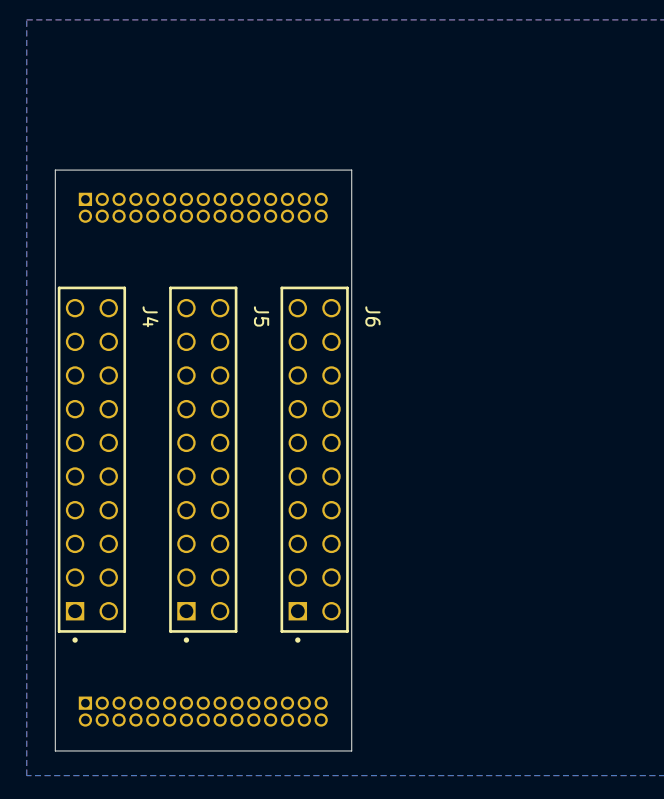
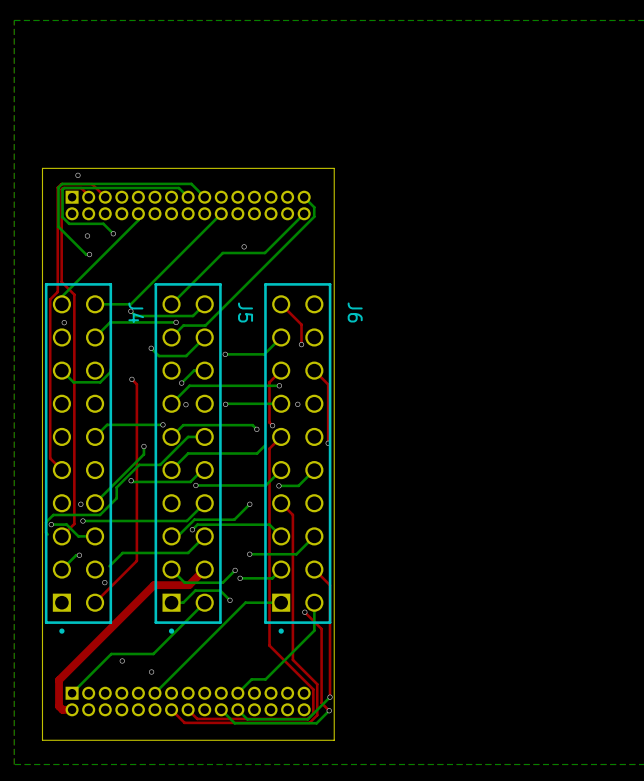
via: none -> (77, 175)
top track: none -> (88, 197) (81, 188) (61, 189) (61, 282) (74, 294) (74, 523) (61, 536)
top track: none -> (105, 197) (92, 184) (61, 184) (57, 187) (57, 291) (50, 299) (50, 458) (61, 470)
bottom track: none -> (188, 197) (178, 188) (64, 188) (62, 189) (62, 217) (69, 223) (103, 223) (113, 233)
bottom track: none -> (204, 197) (191, 183) (62, 183) (58, 187) (58, 226) (86, 254) (89, 254)
bottom track: none -> (304, 197) (314, 207) (314, 216) (205, 325) (183, 325) (171, 337)
bottom track: none -> (138, 213) (138, 220) (61, 296) (61, 304)
bottom track: none -> (221, 213) (130, 304) (95, 304)
bottom track: none -> (304, 213) (264, 253) (222, 253) (171, 304)
via: none -> (113, 233)
via: none -> (87, 235)
via: none -> (244, 246)
via: none -> (89, 254)
bottom track: none -> (204, 304) (193, 316) (135, 316) (130, 311)
top track: none -> (281, 304) (301, 324) (301, 344)
via: none -> (130, 311)
via: none -> (64, 322)
bottom track: none -> (176, 322) (110, 322) (95, 337)
via: none -> (176, 322)
bottom track: none -> (204, 337) (186, 356) (158, 356) (151, 348)
bottom track: none -> (281, 337) (264, 354) (225, 354)
via: none -> (301, 344)
via: none -> (151, 348)
via: none -> (225, 354)
bottom track: none -> (110, 369) (110, 371) (100, 382) (73, 382) (61, 370)
bottom track: none -> (204, 370) (194, 370) (181, 383)
top track: none -> (281, 370) (269, 382) (269, 422) (272, 425)
top track: none -> (314, 370) (328, 384) (328, 443)
top track: none -> (131, 379) (136, 384) (136, 560) (95, 602)
via: none -> (131, 379)
via: none -> (181, 383)
bottom track: none -> (279, 385) (189, 385) (171, 403)
via: none -> (279, 385)
via: none -> (225, 404)
bottom track: none -> (281, 403) (225, 404)
via: none -> (297, 404)
via: none -> (185, 404)
bottom track: none -> (162, 424) (107, 424) (95, 436)
via: none -> (162, 424)
via: none -> (272, 425)
bottom track: none -> (256, 429) (252, 425) (183, 425) (171, 436)
via: none -> (256, 429)
bottom track: none -> (204, 436) (188, 436) (160, 464) (139, 464) (116, 487) (116, 498) (100, 514) (53, 514) (46, 522) (47, 534)
top track: none -> (281, 436) (269, 448) (269, 645) (313, 689) (313, 713) (307, 718) (197, 718) (188, 709)
via: none -> (328, 443)
bottom track: none -> (265, 445) (257, 453) (188, 453) (171, 470)
bottom track: none -> (143, 446) (143, 454) (95, 503)
via: none -> (143, 446)
bottom track: none -> (204, 470) (202, 470) (190, 481) (131, 480)
bottom track: none -> (281, 470) (265, 485) (195, 485)
bottom track: none -> (314, 470) (298, 485) (278, 485)
via: none -> (131, 480)
via: none -> (195, 485)
via: none -> (278, 485)
bottom track: none -> (204, 503) (186, 521) (82, 521)
top track: none -> (281, 503) (292, 514) (292, 659) (317, 684) (317, 715) (309, 722) (184, 722) (171, 709)
via: none -> (80, 504)
bottom track: none -> (249, 504) (234, 519) (194, 519) (177, 536) (171, 536)
via: none -> (249, 504)
via: none -> (82, 521)
bottom track: none -> (51, 524) (66, 524) (78, 536) (95, 536)
via: none -> (51, 524)
bottom track: none -> (192, 529) (197, 524) (269, 524) (281, 536)
via: none -> (192, 529)
bottom track: none -> (204, 536) (188, 552) (122, 552) (109, 566)
bottom track: none -> (314, 536) (296, 554) (249, 554)
via: none -> (249, 554)
bottom track: none -> (79, 555) (76, 555) (61, 569)
via: none -> (79, 555)
bottom track: none -> (171, 569) (184, 582) (222, 582) (235, 570)
top track: none -> (204, 569) (189, 585) (154, 585) (59, 680) (59, 706) (62, 709) (72, 709)
bottom track: none -> (281, 569) (272, 578) (240, 578)
top track: none -> (314, 569) (330, 585) (330, 697)
via: none -> (235, 570)
via: none -> (240, 578)
via: none -> (104, 582)
bottom track: none -> (230, 600) (220, 590) (195, 590) (183, 602) (171, 602)
via: none -> (230, 600)
bottom track: none -> (204, 602) (153, 654) (111, 654) (72, 693)
bottom track: none -> (281, 602) (245, 602) (154, 693)
bottom track: none -> (314, 602) (314, 630) (265, 679) (251, 679) (237, 693)
top track: none -> (304, 612) (321, 629) (321, 703) (329, 710)
via: none -> (304, 612)
via: none -> (122, 660)
via: none -> (151, 672)
bottom track: none -> (330, 697) (307, 719) (247, 719) (237, 709)
via: none -> (330, 697)
bottom track: none -> (221, 709) (234, 723) (316, 723) (329, 710)
via: none -> (329, 710)

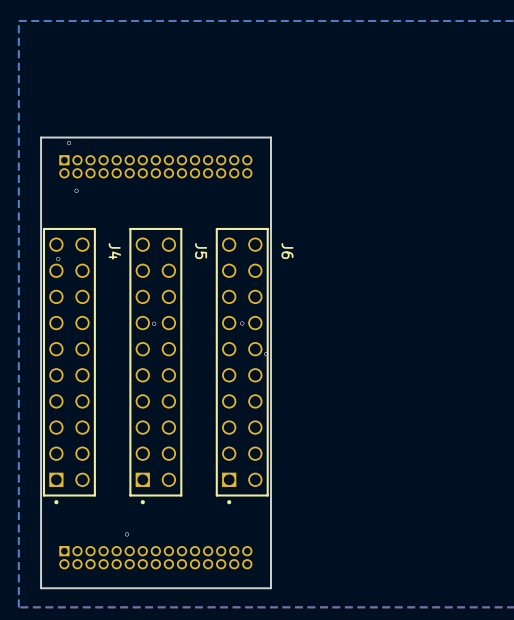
top track: (88, 197) (81, 188) (61, 189) (61, 282) (74, 294) (74, 523) (61, 536) -> none
top track: (105, 197) (92, 184) (61, 184) (57, 187) (57, 291) (50, 299) (50, 458) (61, 470) -> none
bottom track: (188, 197) (178, 188) (64, 188) (62, 189) (62, 217) (69, 223) (103, 223) (113, 233) -> none
bottom track: (204, 197) (191, 183) (62, 183) (58, 187) (58, 226) (86, 254) (89, 254) -> none
bottom track: (304, 197) (314, 207) (314, 216) (205, 325) (183, 325) (171, 337) -> none
bottom track: (138, 213) (138, 220) (61, 296) (61, 304) -> none
bottom track: (221, 213) (130, 304) (95, 304) -> none
bottom track: (304, 213) (264, 253) (222, 253) (171, 304) -> none
via: (113, 233) -> none
via: (244, 246) -> none
via: (89, 254) -> none
bottom track: (204, 304) (193, 316) (135, 316) (130, 311) -> none
top track: (281, 304) (301, 324) (301, 344) -> none
via: (130, 311) -> none
bottom track: (176, 322) (110, 322) (95, 337) -> none
via: (176, 322) -> none
bottom track: (204, 337) (186, 356) (158, 356) (151, 348) -> none
bottom track: (281, 337) (264, 354) (225, 354) -> none
via: (301, 344) -> none
via: (151, 348) -> none
via: (225, 354) -> none
bottom track: (110, 369) (110, 371) (100, 382) (73, 382) (61, 370) -> none
bottom track: (204, 370) (194, 370) (181, 383) -> none
top track: (281, 370) (269, 382) (269, 422) (272, 425) -> none
top track: (314, 370) (328, 384) (328, 443) -> none
top track: (131, 379) (136, 384) (136, 560) (95, 602) -> none
via: (131, 379) -> none
via: (181, 383) -> none
bottom track: (279, 385) (189, 385) (171, 403) -> none
via: (279, 385) -> none
bottom track: (281, 403) (225, 404) -> none
via: (225, 404) -> none
bottom track: (162, 424) (107, 424) (95, 436) -> none
via: (162, 424) -> none
via: (272, 425) -> none
bottom track: (256, 429) (252, 425) (183, 425) (171, 436) -> none
via: (256, 429) -> none
bottom track: (204, 436) (188, 436) (160, 464) (139, 464) (116, 487) (116, 498) (100, 514) (53, 514) (46, 522) (47, 534) -> none
top track: (281, 436) (269, 448) (269, 645) (313, 689) (313, 713) (307, 718) (197, 718) (188, 709) -> none
bottom track: (265, 445) (257, 453) (188, 453) (171, 470) -> none
bottom track: (143, 446) (143, 454) (95, 503) -> none
via: (143, 446) -> none
bottom track: (204, 470) (202, 470) (190, 481) (131, 480) -> none
bottom track: (281, 470) (265, 485) (195, 485) -> none
bottom track: (314, 470) (298, 485) (278, 485) -> none
via: (131, 480) -> none
via: (195, 485) -> none
via: (278, 485) -> none
bottom track: (204, 503) (186, 521) (82, 521) -> none
top track: (281, 503) (292, 514) (292, 659) (317, 684) (317, 715) (309, 722) (184, 722) (171, 709) -> none
via: (80, 504) -> none
bottom track: (249, 504) (234, 519) (194, 519) (177, 536) (171, 536) -> none
via: (249, 504) -> none
via: (82, 521) -> none
bottom track: (51, 524) (66, 524) (78, 536) (95, 536) -> none
via: (51, 524) -> none
bottom track: (192, 529) (197, 524) (269, 524) (281, 536) -> none
via: (192, 529) -> none
bottom track: (204, 536) (188, 552) (122, 552) (109, 566) -> none
bottom track: (314, 536) (296, 554) (249, 554) -> none
via: (249, 554) -> none
bottom track: (79, 555) (76, 555) (61, 569) -> none
via: (79, 555) -> none
bottom track: (171, 569) (184, 582) (222, 582) (235, 570) -> none
top track: (204, 569) (189, 585) (154, 585) (59, 680) (59, 706) (62, 709) (72, 709) -> none
bottom track: (281, 569) (272, 578) (240, 578) -> none
top track: (314, 569) (330, 585) (330, 697) -> none
via: (235, 570) -> none
via: (240, 578) -> none
via: (104, 582) -> none
bottom track: (230, 600) (220, 590) (195, 590) (183, 602) (171, 602) -> none
via: (230, 600) -> none
bottom track: (204, 602) (153, 654) (111, 654) (72, 693) -> none
bottom track: (281, 602) (245, 602) (154, 693) -> none
bottom track: (314, 602) (314, 630) (265, 679) (251, 679) (237, 693) -> none
top track: (304, 612) (321, 629) (321, 703) (329, 710) -> none
via: (304, 612) -> none
via: (122, 660) -> none
bottom track: (330, 697) (307, 719) (247, 719) (237, 709) -> none
via: (330, 697) -> none
bottom track: (221, 709) (234, 723) (316, 723) (329, 710) -> none
via: (329, 710) -> none

